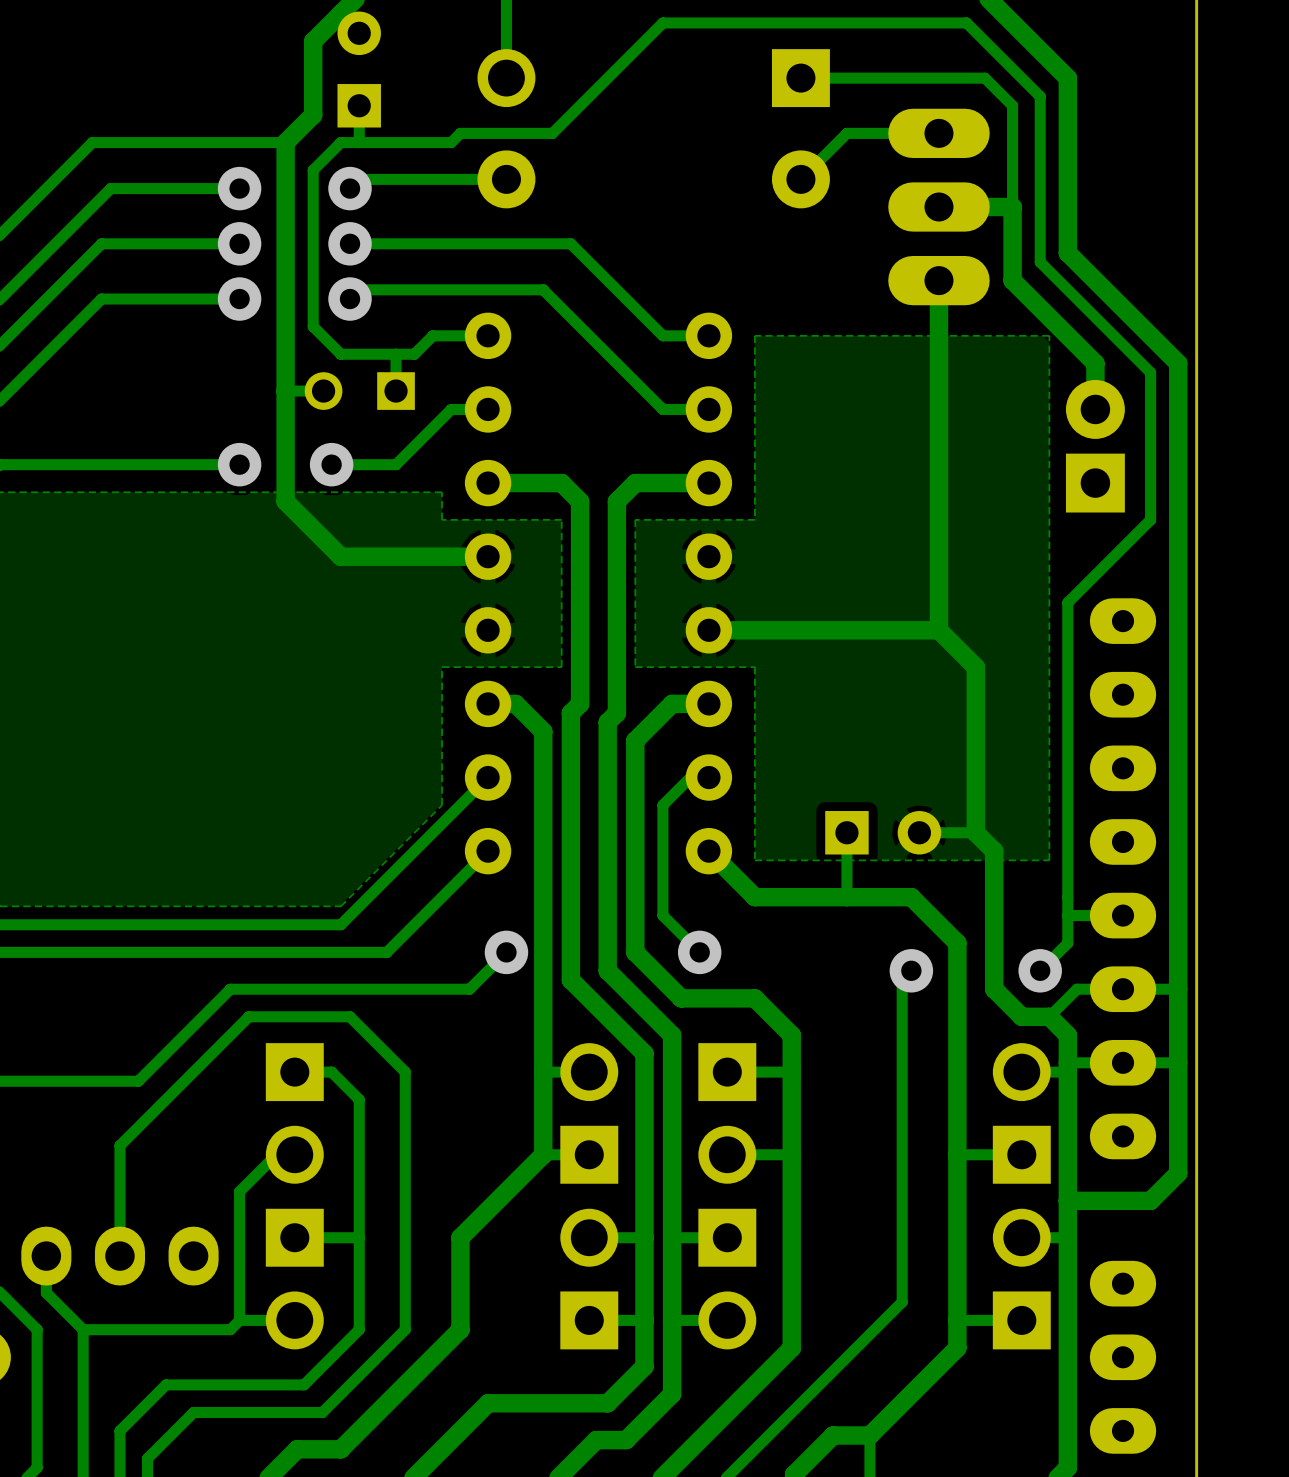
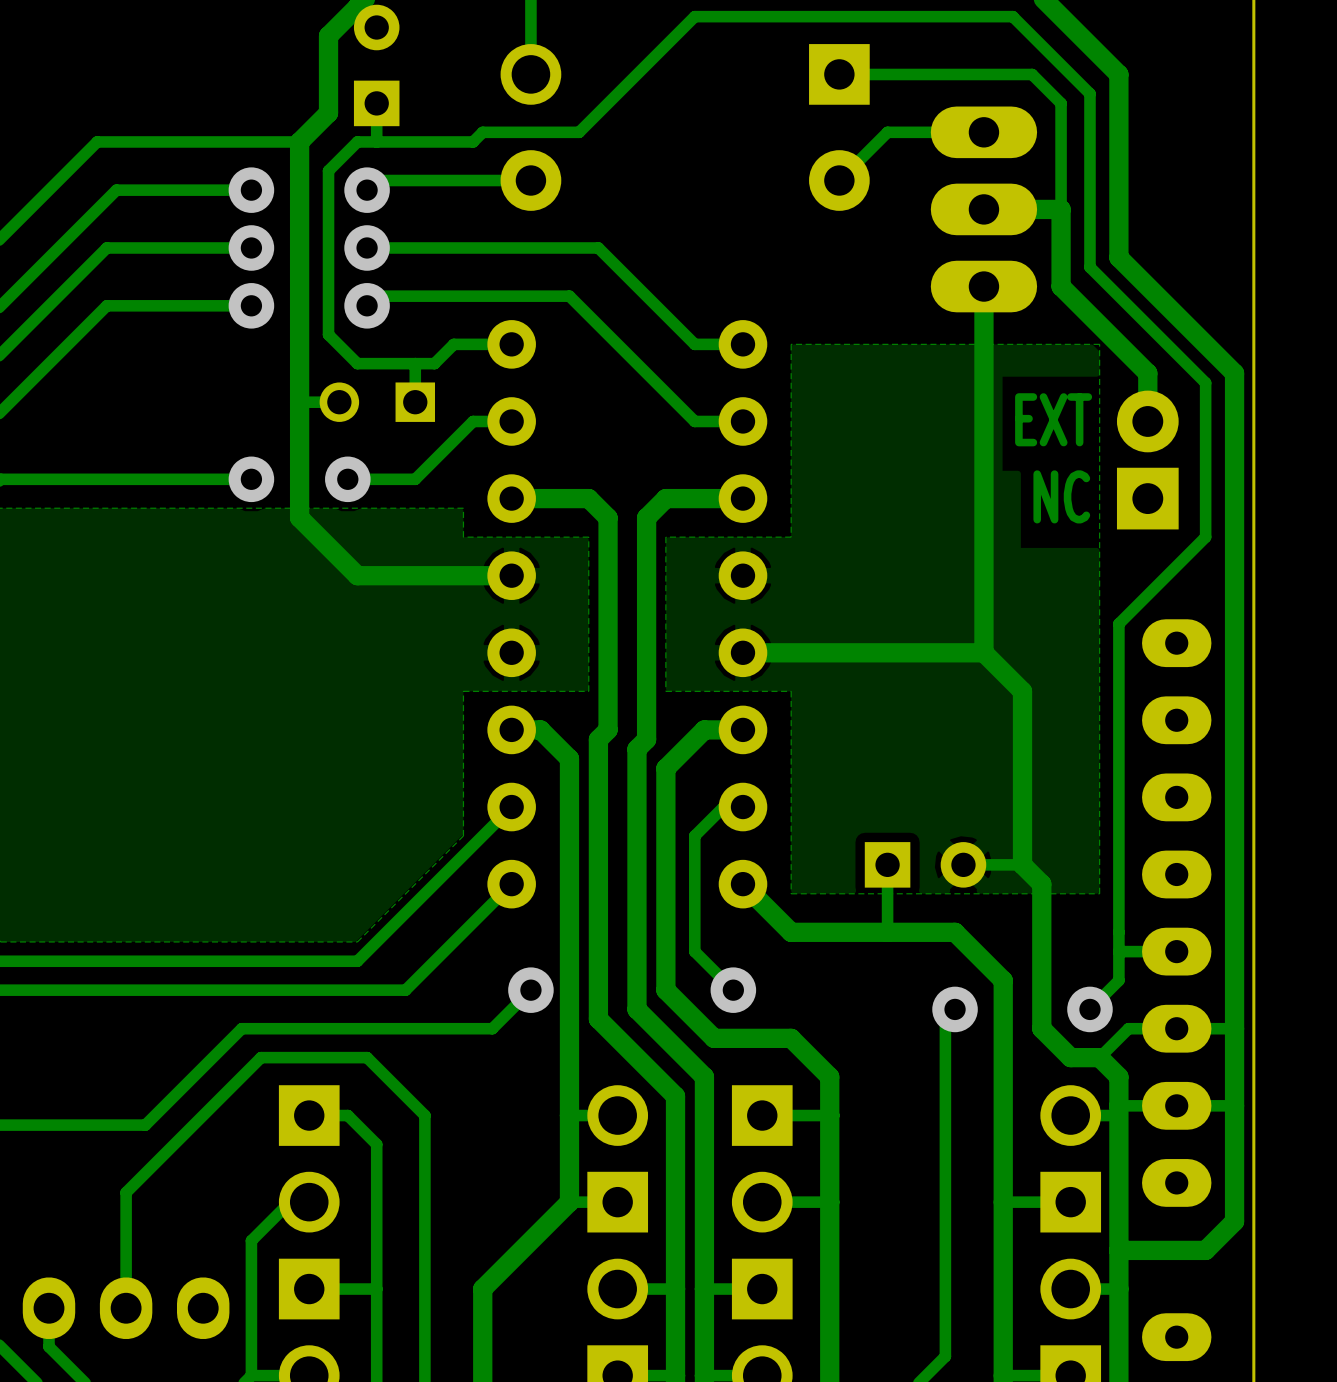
text: none -> EXT (1053, 419)
text: none -> NC (1061, 496)

